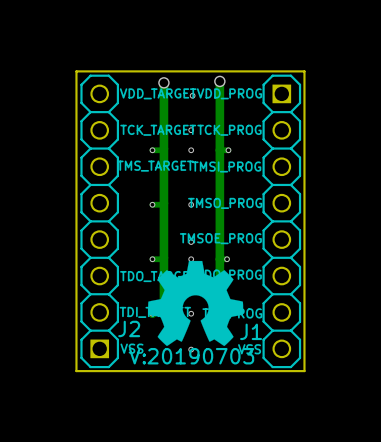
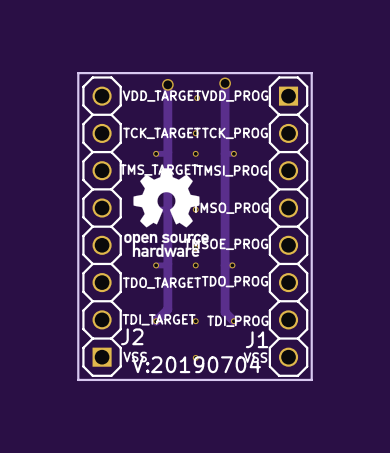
drawing: none -> [124, 168, 209, 257]
drawing: [148, 260, 244, 347] -> none
drawing shape: [128, 347, 255, 365] -> [131, 355, 261, 374]

